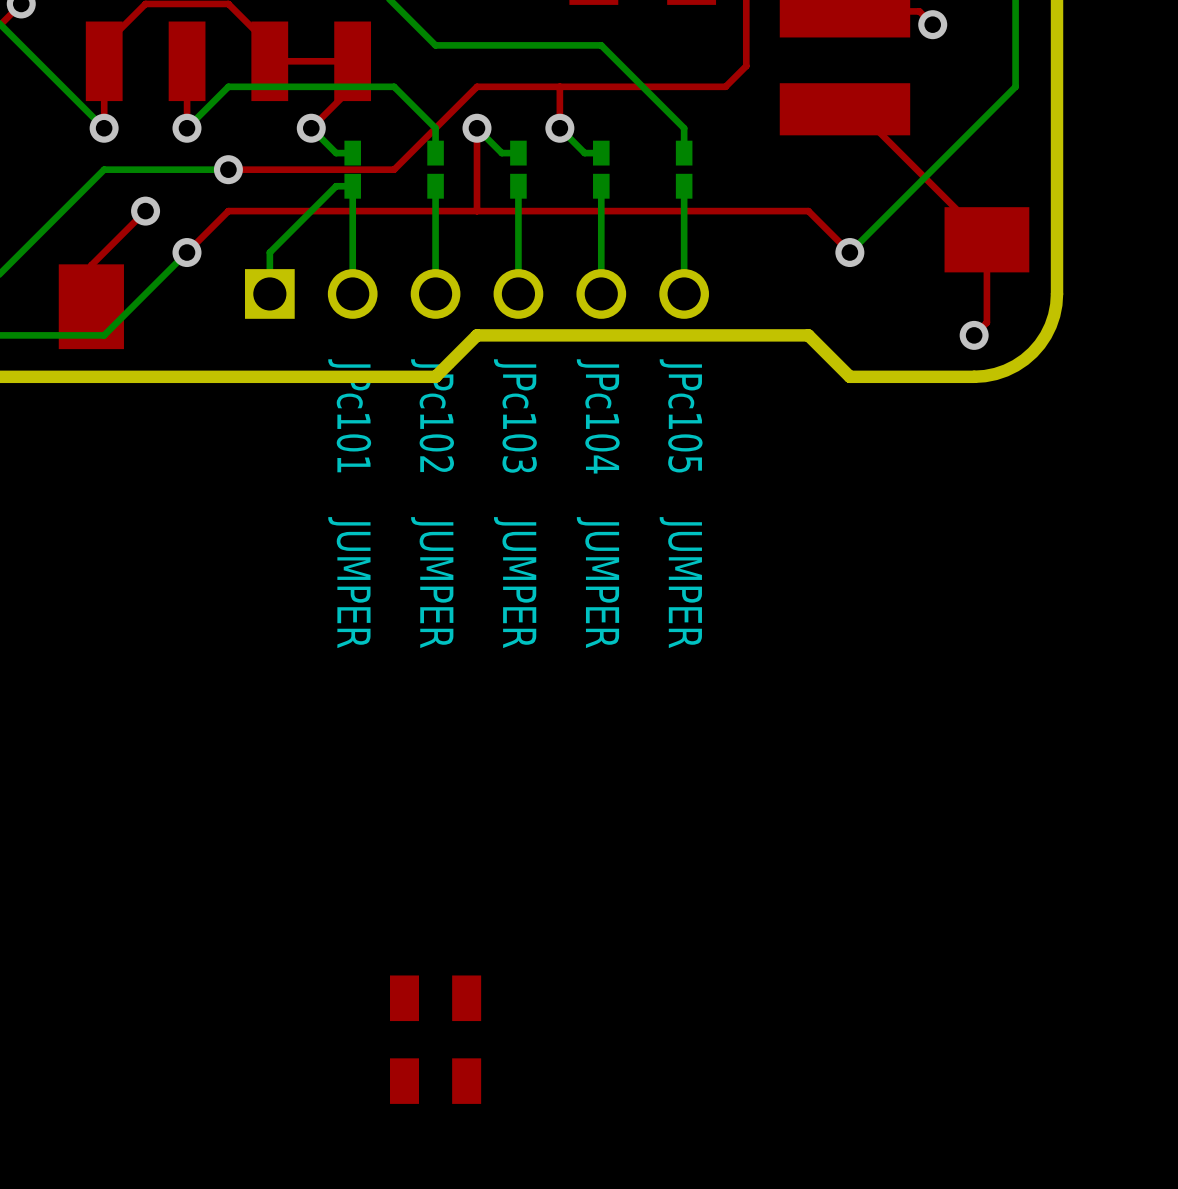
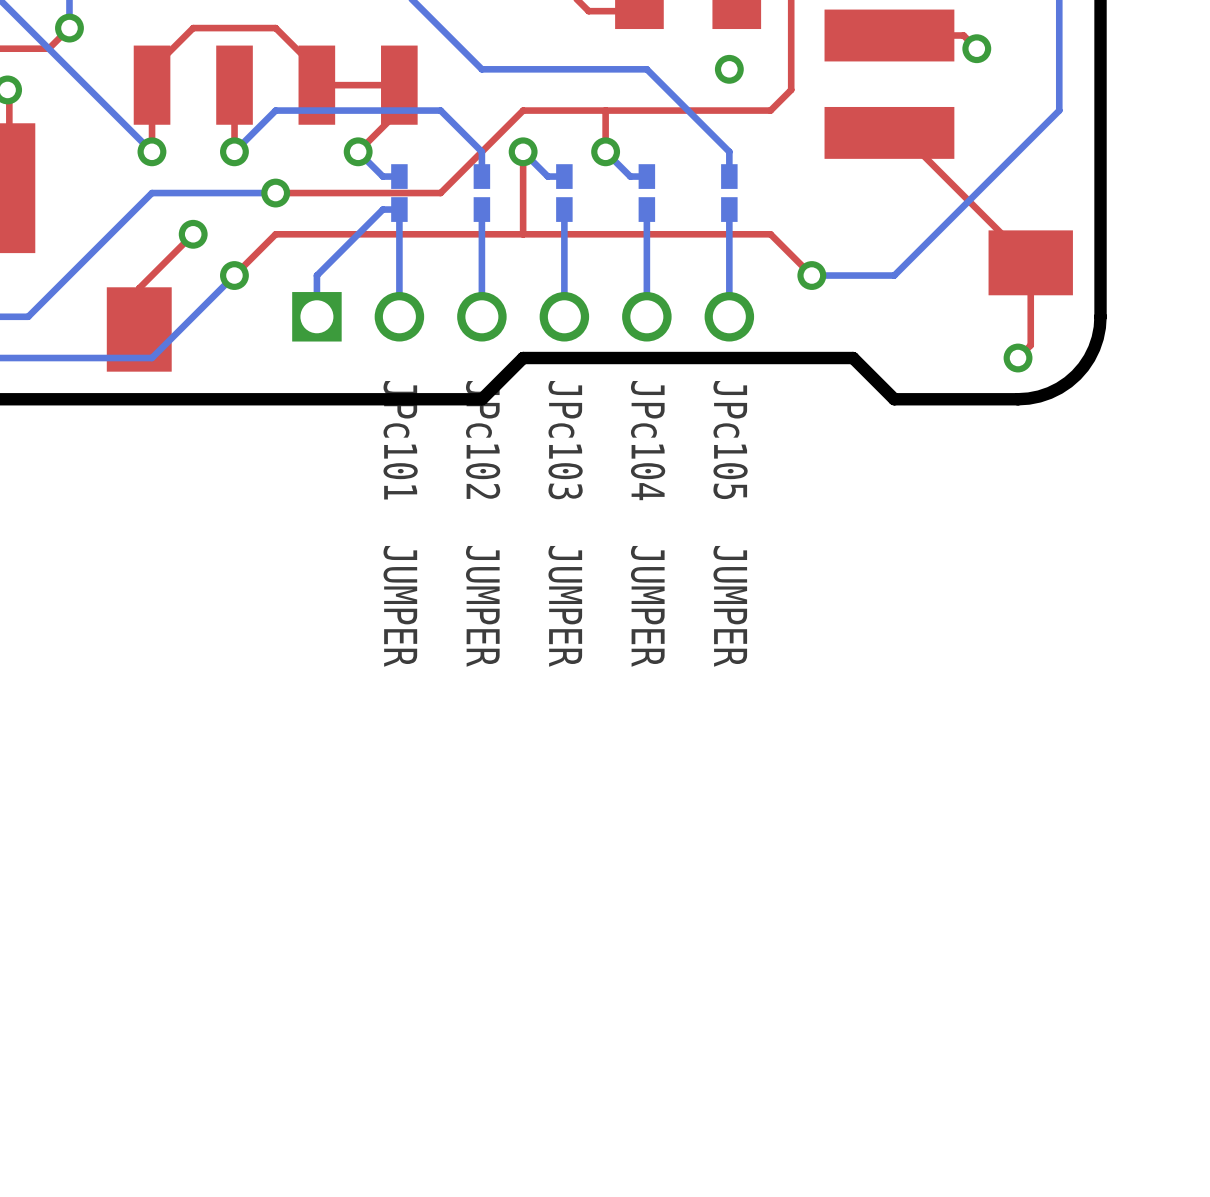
via: none -> (729, 69)
top track: (725, 211) (808, 211) (849, 252) -> (770, 234) (811, 275)
bottom track: none -> (894, 275) (811, 275)
via position: (849, 252) -> (811, 275)
part: (435, 998) -> none
part: (435, 1081) -> none

